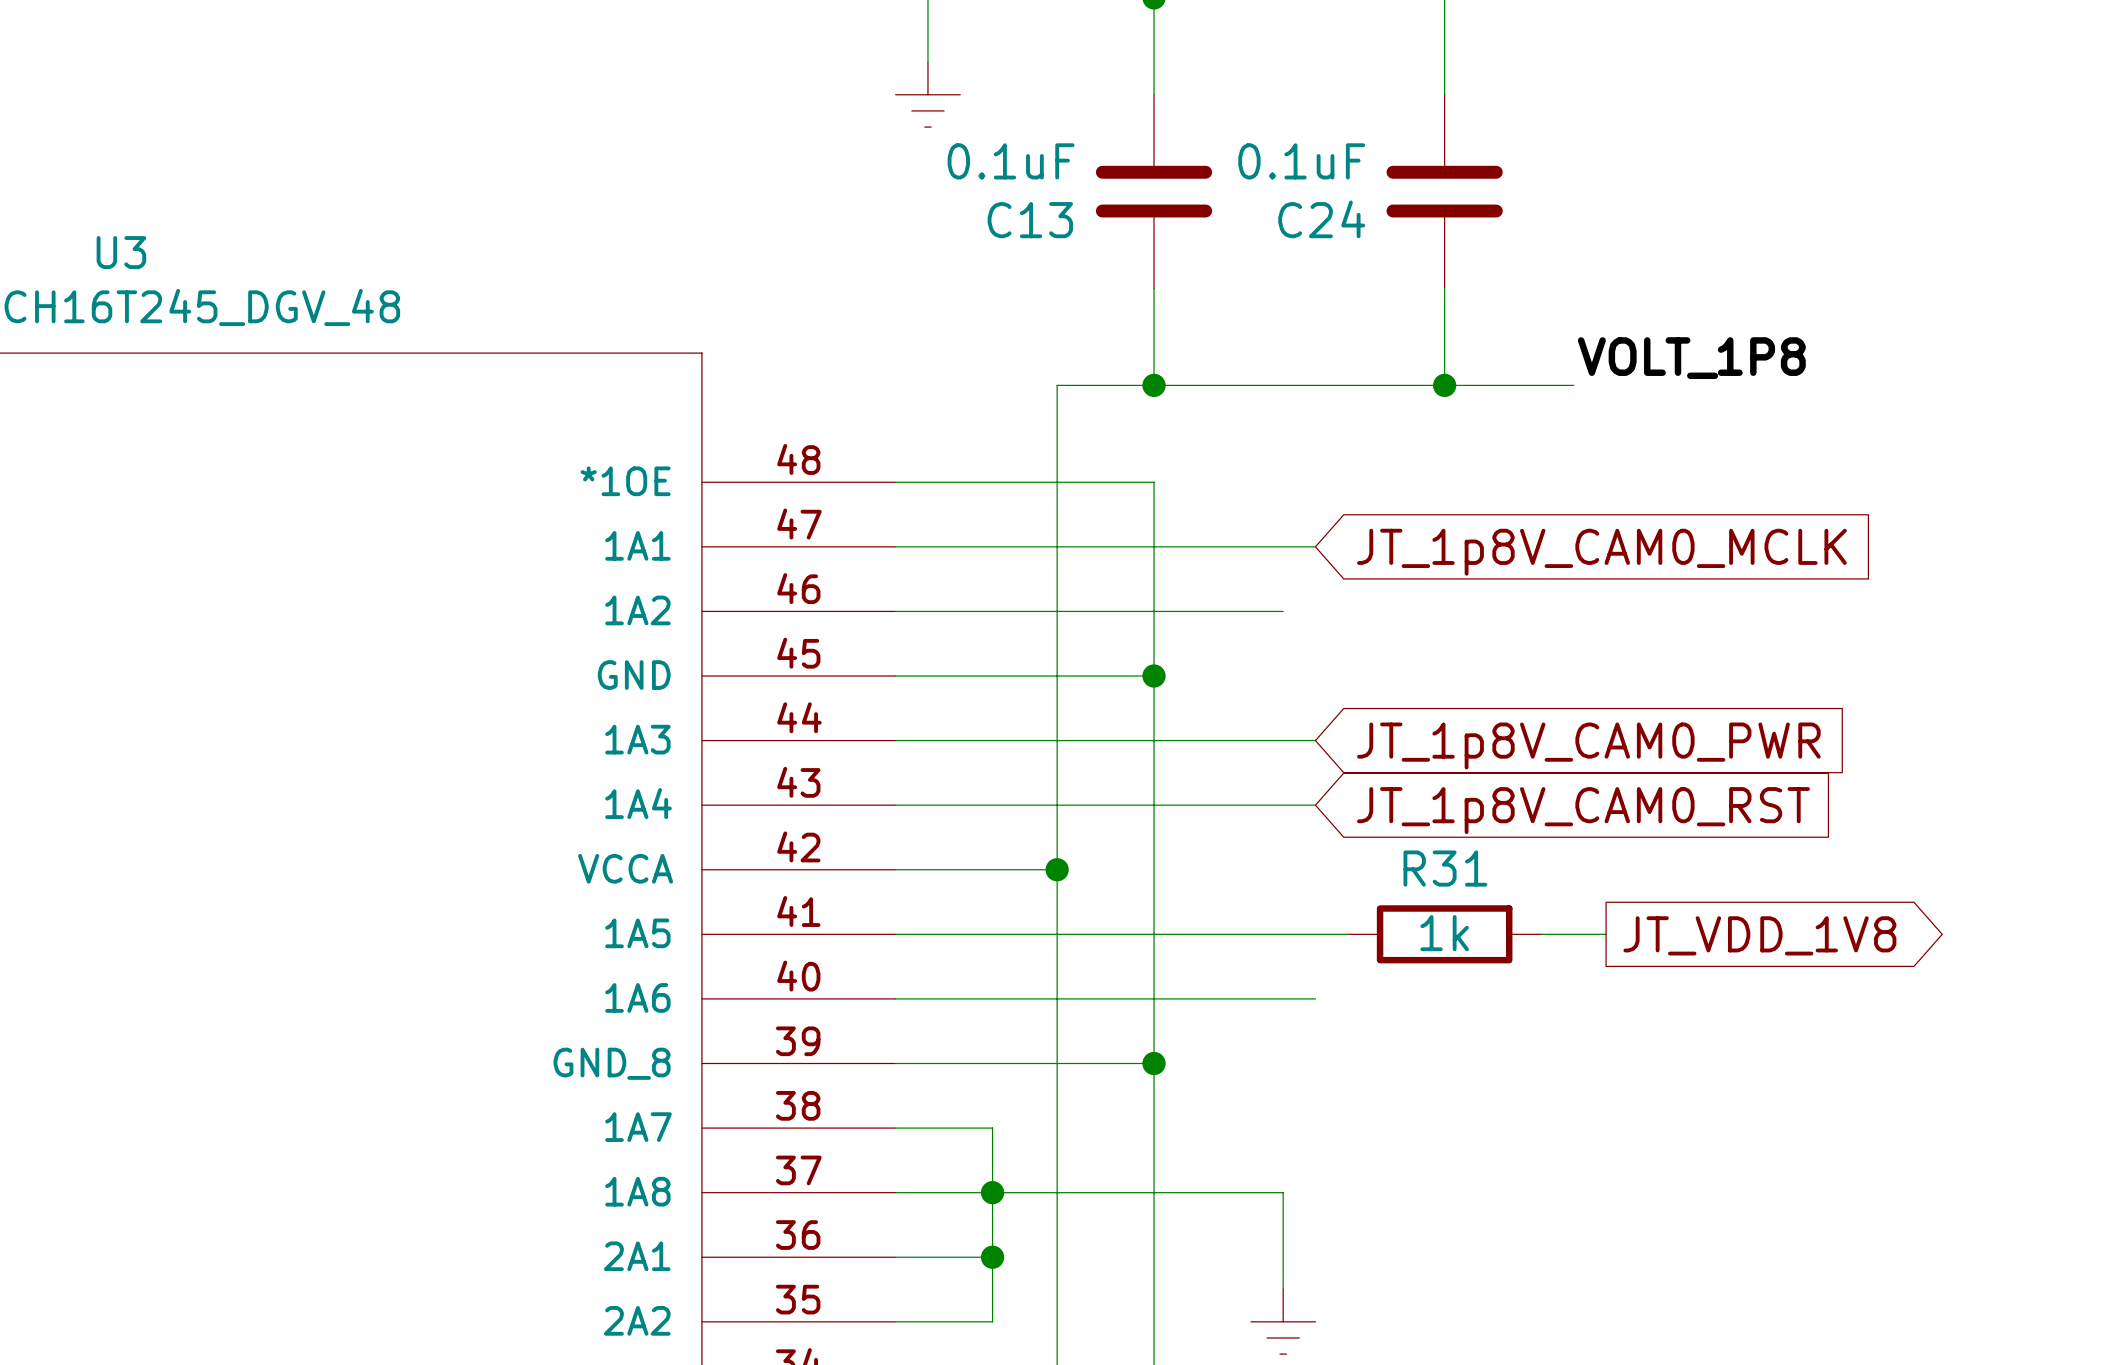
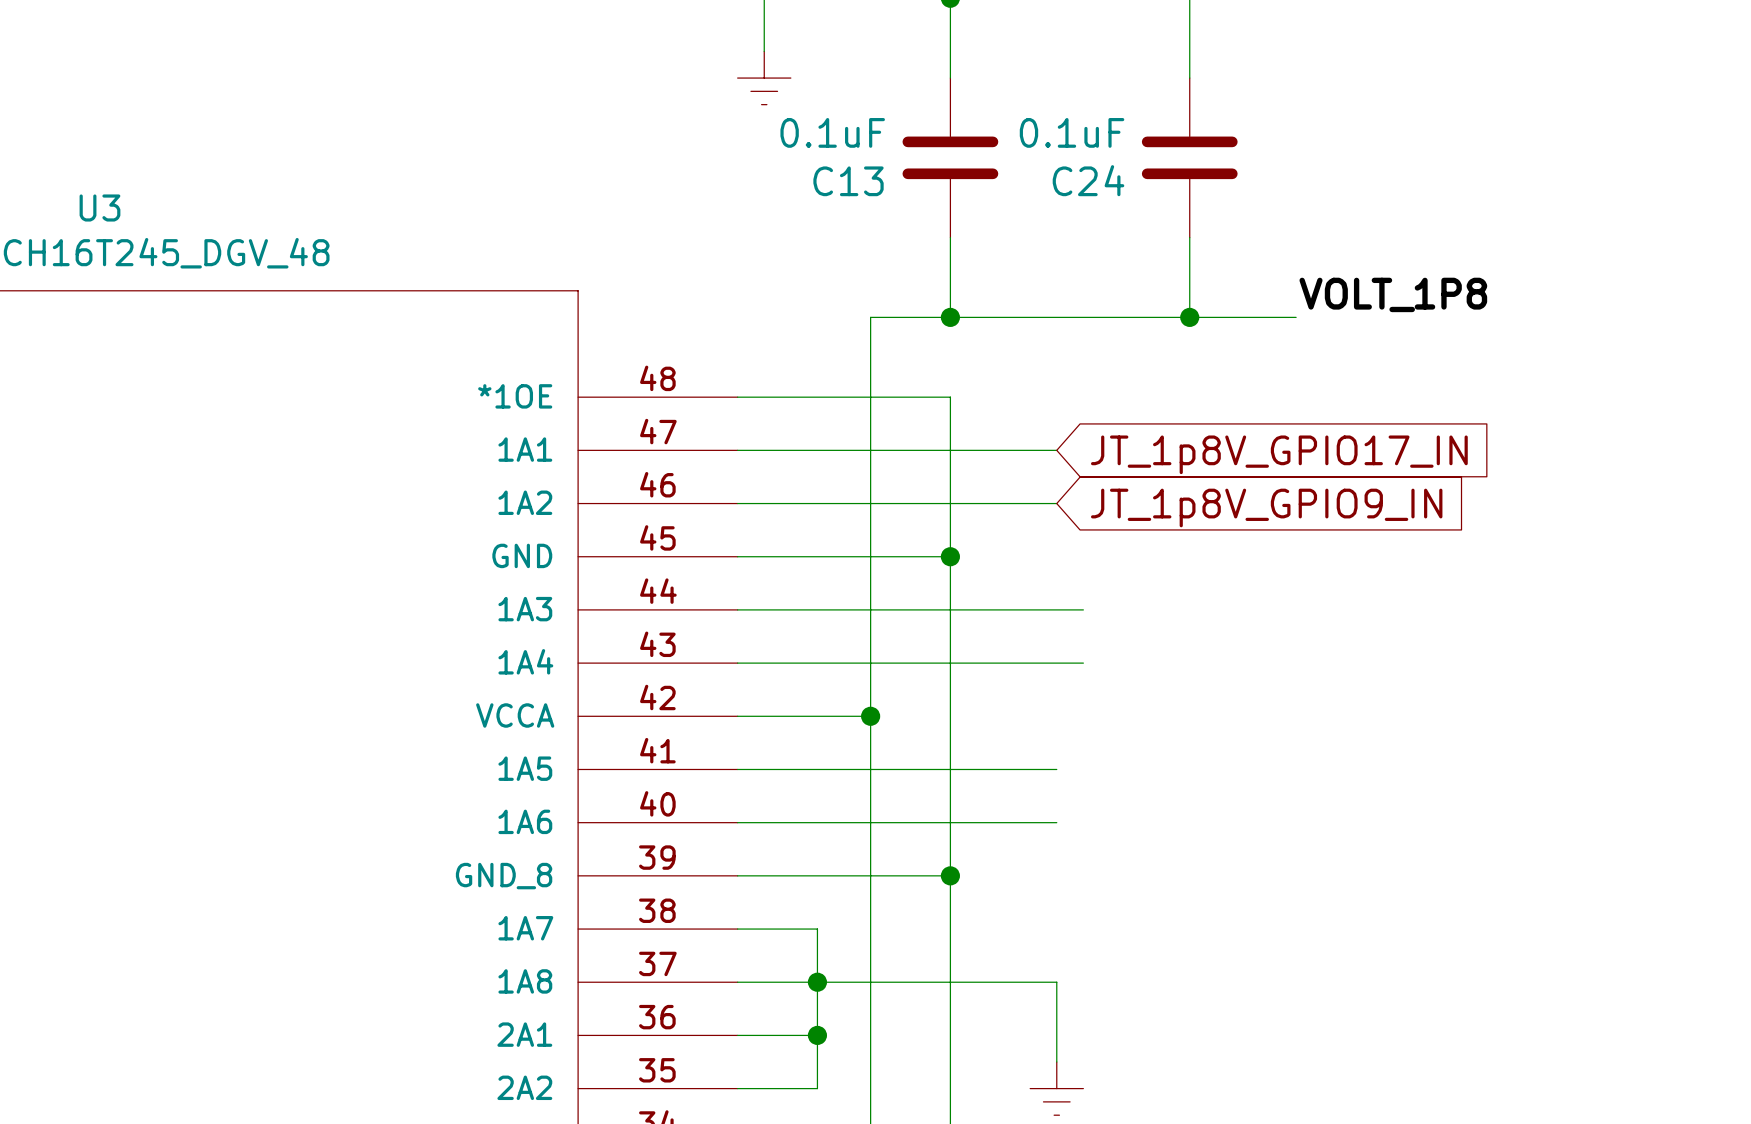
wire: (1283, 546) (1315, 546) -> none
global label: none -> JT_1p8V_GPIO17_IN (1279, 454)
global label: JT_1p8V_CAM0_MCLK (1601, 552) -> none
global label: none -> JT_1p8V_GPIO9_IN (1266, 507)
global label: JT_1p8V_CAM0_PWR (1588, 745) -> none
global label: JT_1p8V_CAM0_RST (1583, 810) -> none
wire: (1283, 934) (1347, 934) -> none
R31: 1k (1444, 934) -> none
wire: (1541, 934) (1606, 934) -> none
global label: JT_VDD_1V8 (1759, 935) -> none
wire: (1283, 998) (1315, 998) -> none

